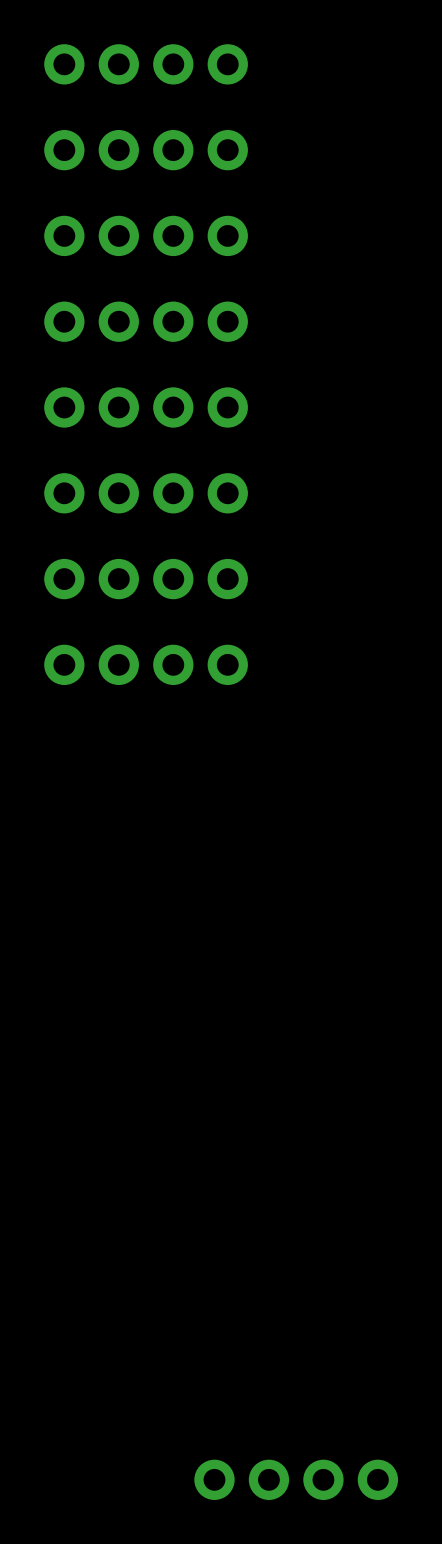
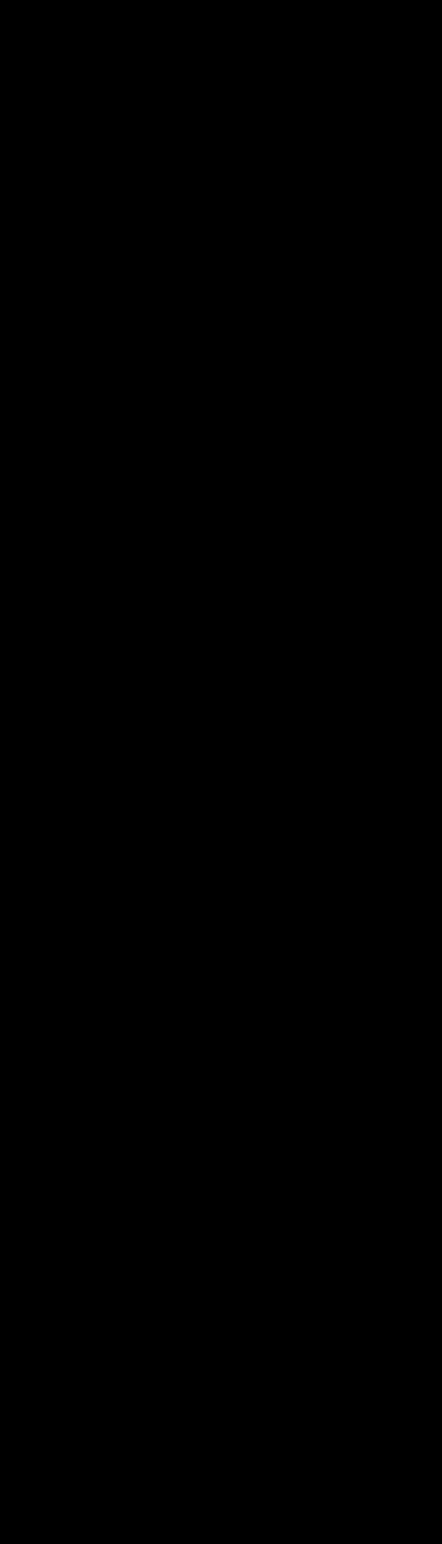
part: (146, 64) -> none
part: (146, 150) -> none
part: (146, 235) -> none
part: (146, 321) -> none
part: (146, 407) -> none
part: (146, 493) -> none
part: (146, 579) -> none
part: (146, 664) -> none
part: (296, 1479) -> none

